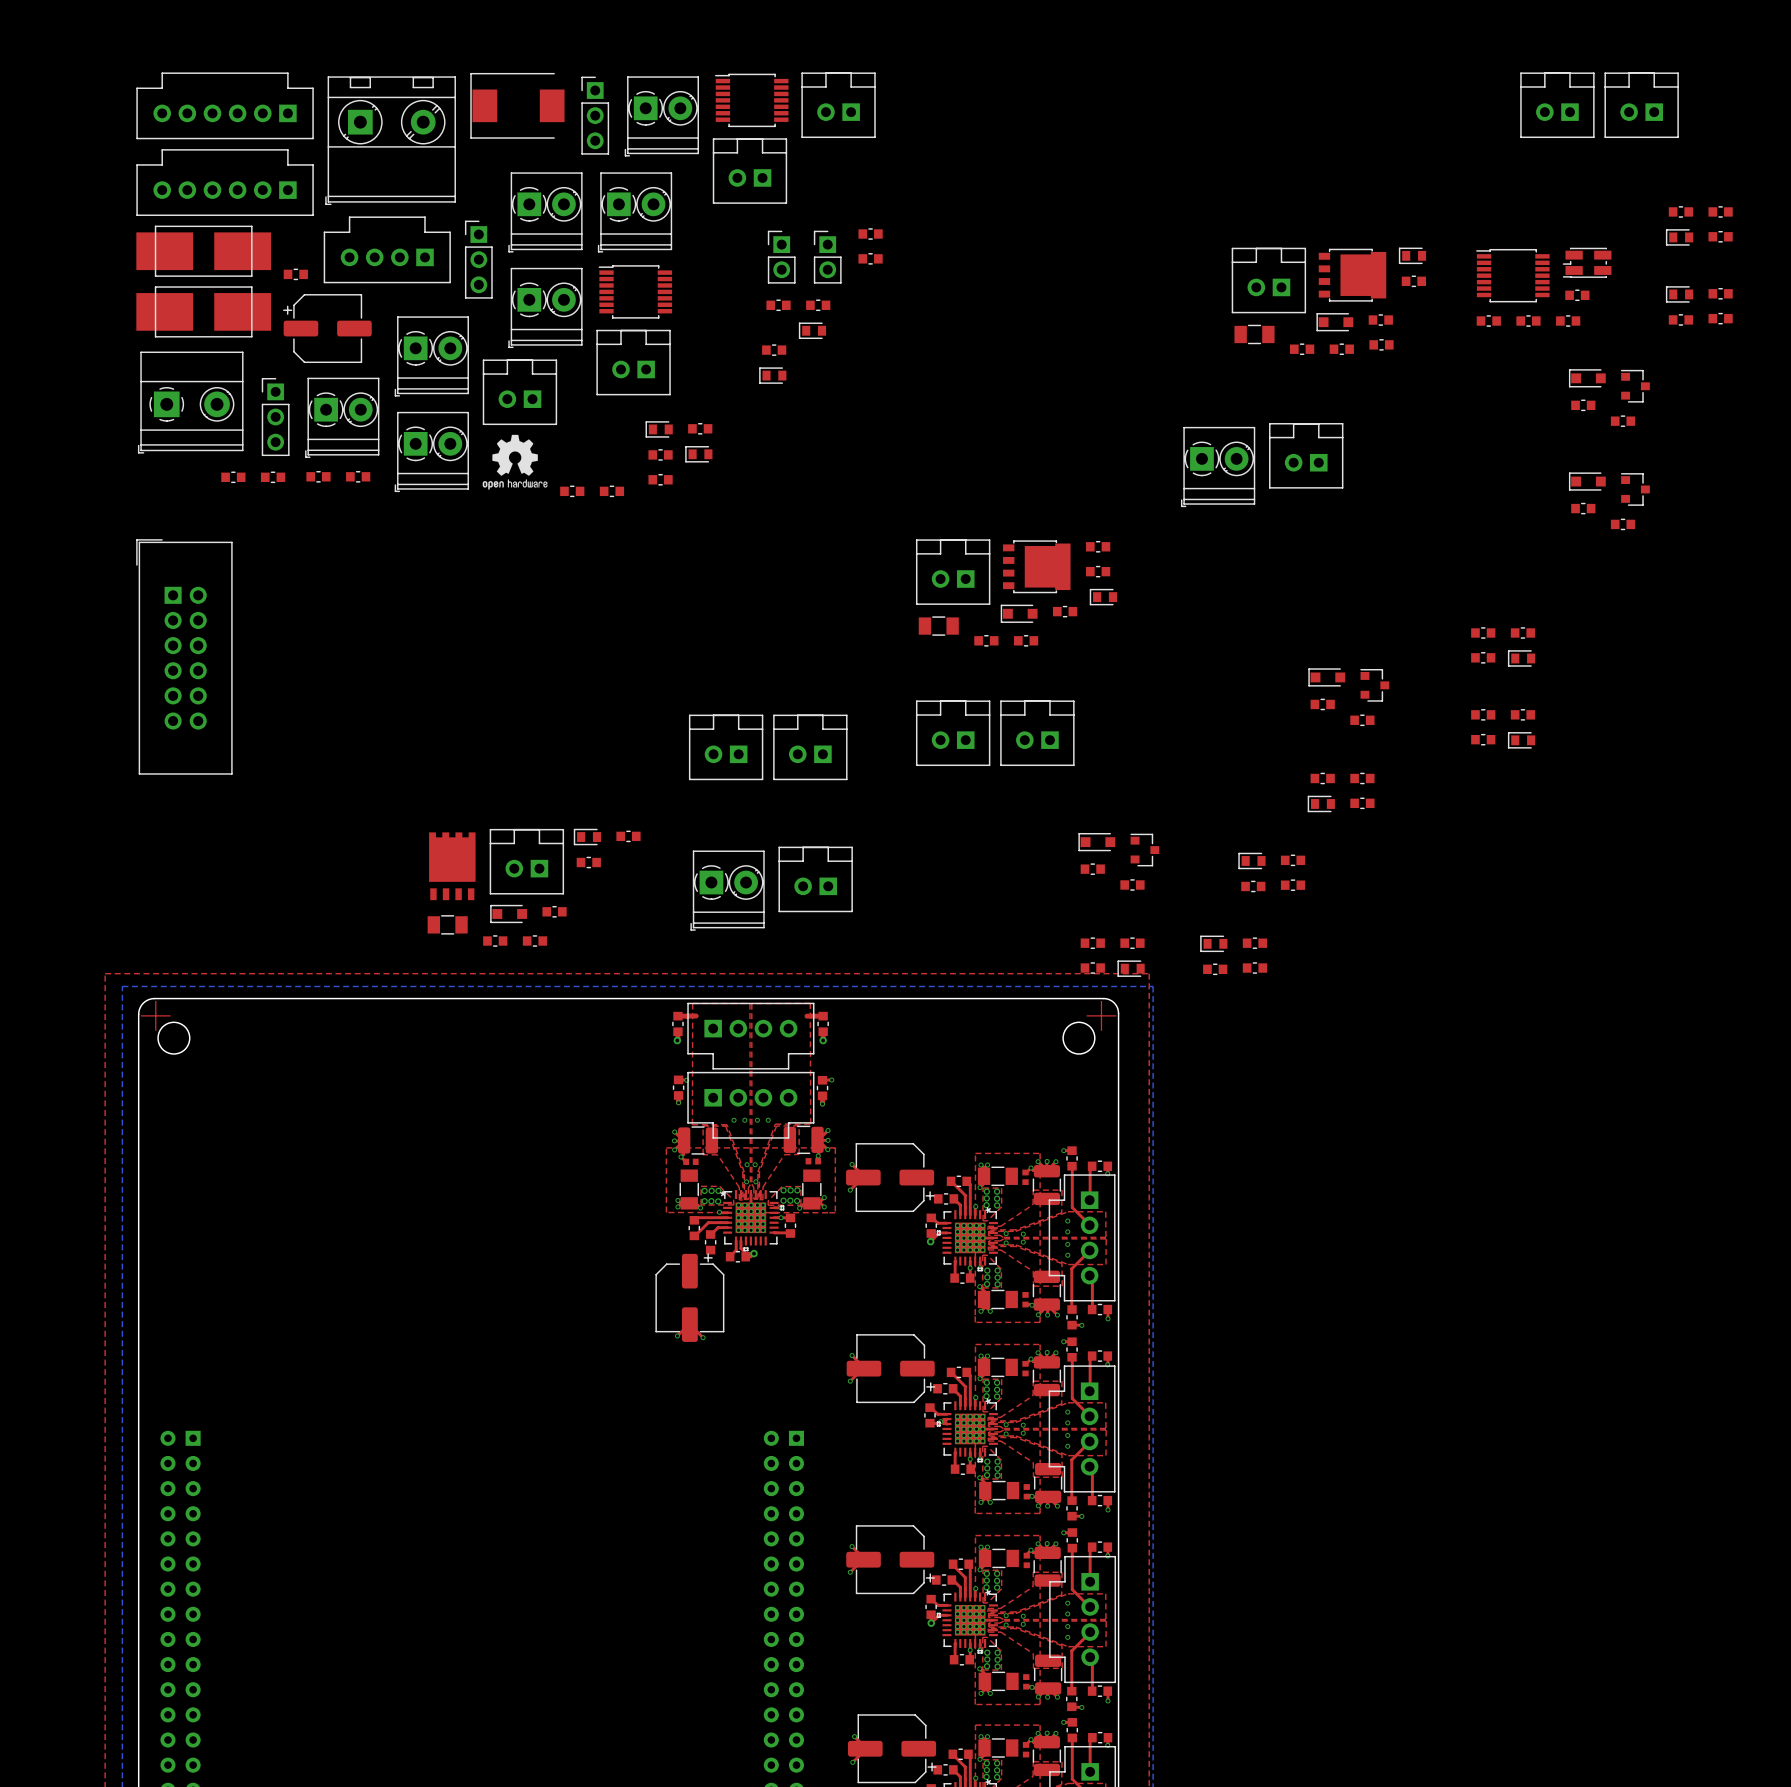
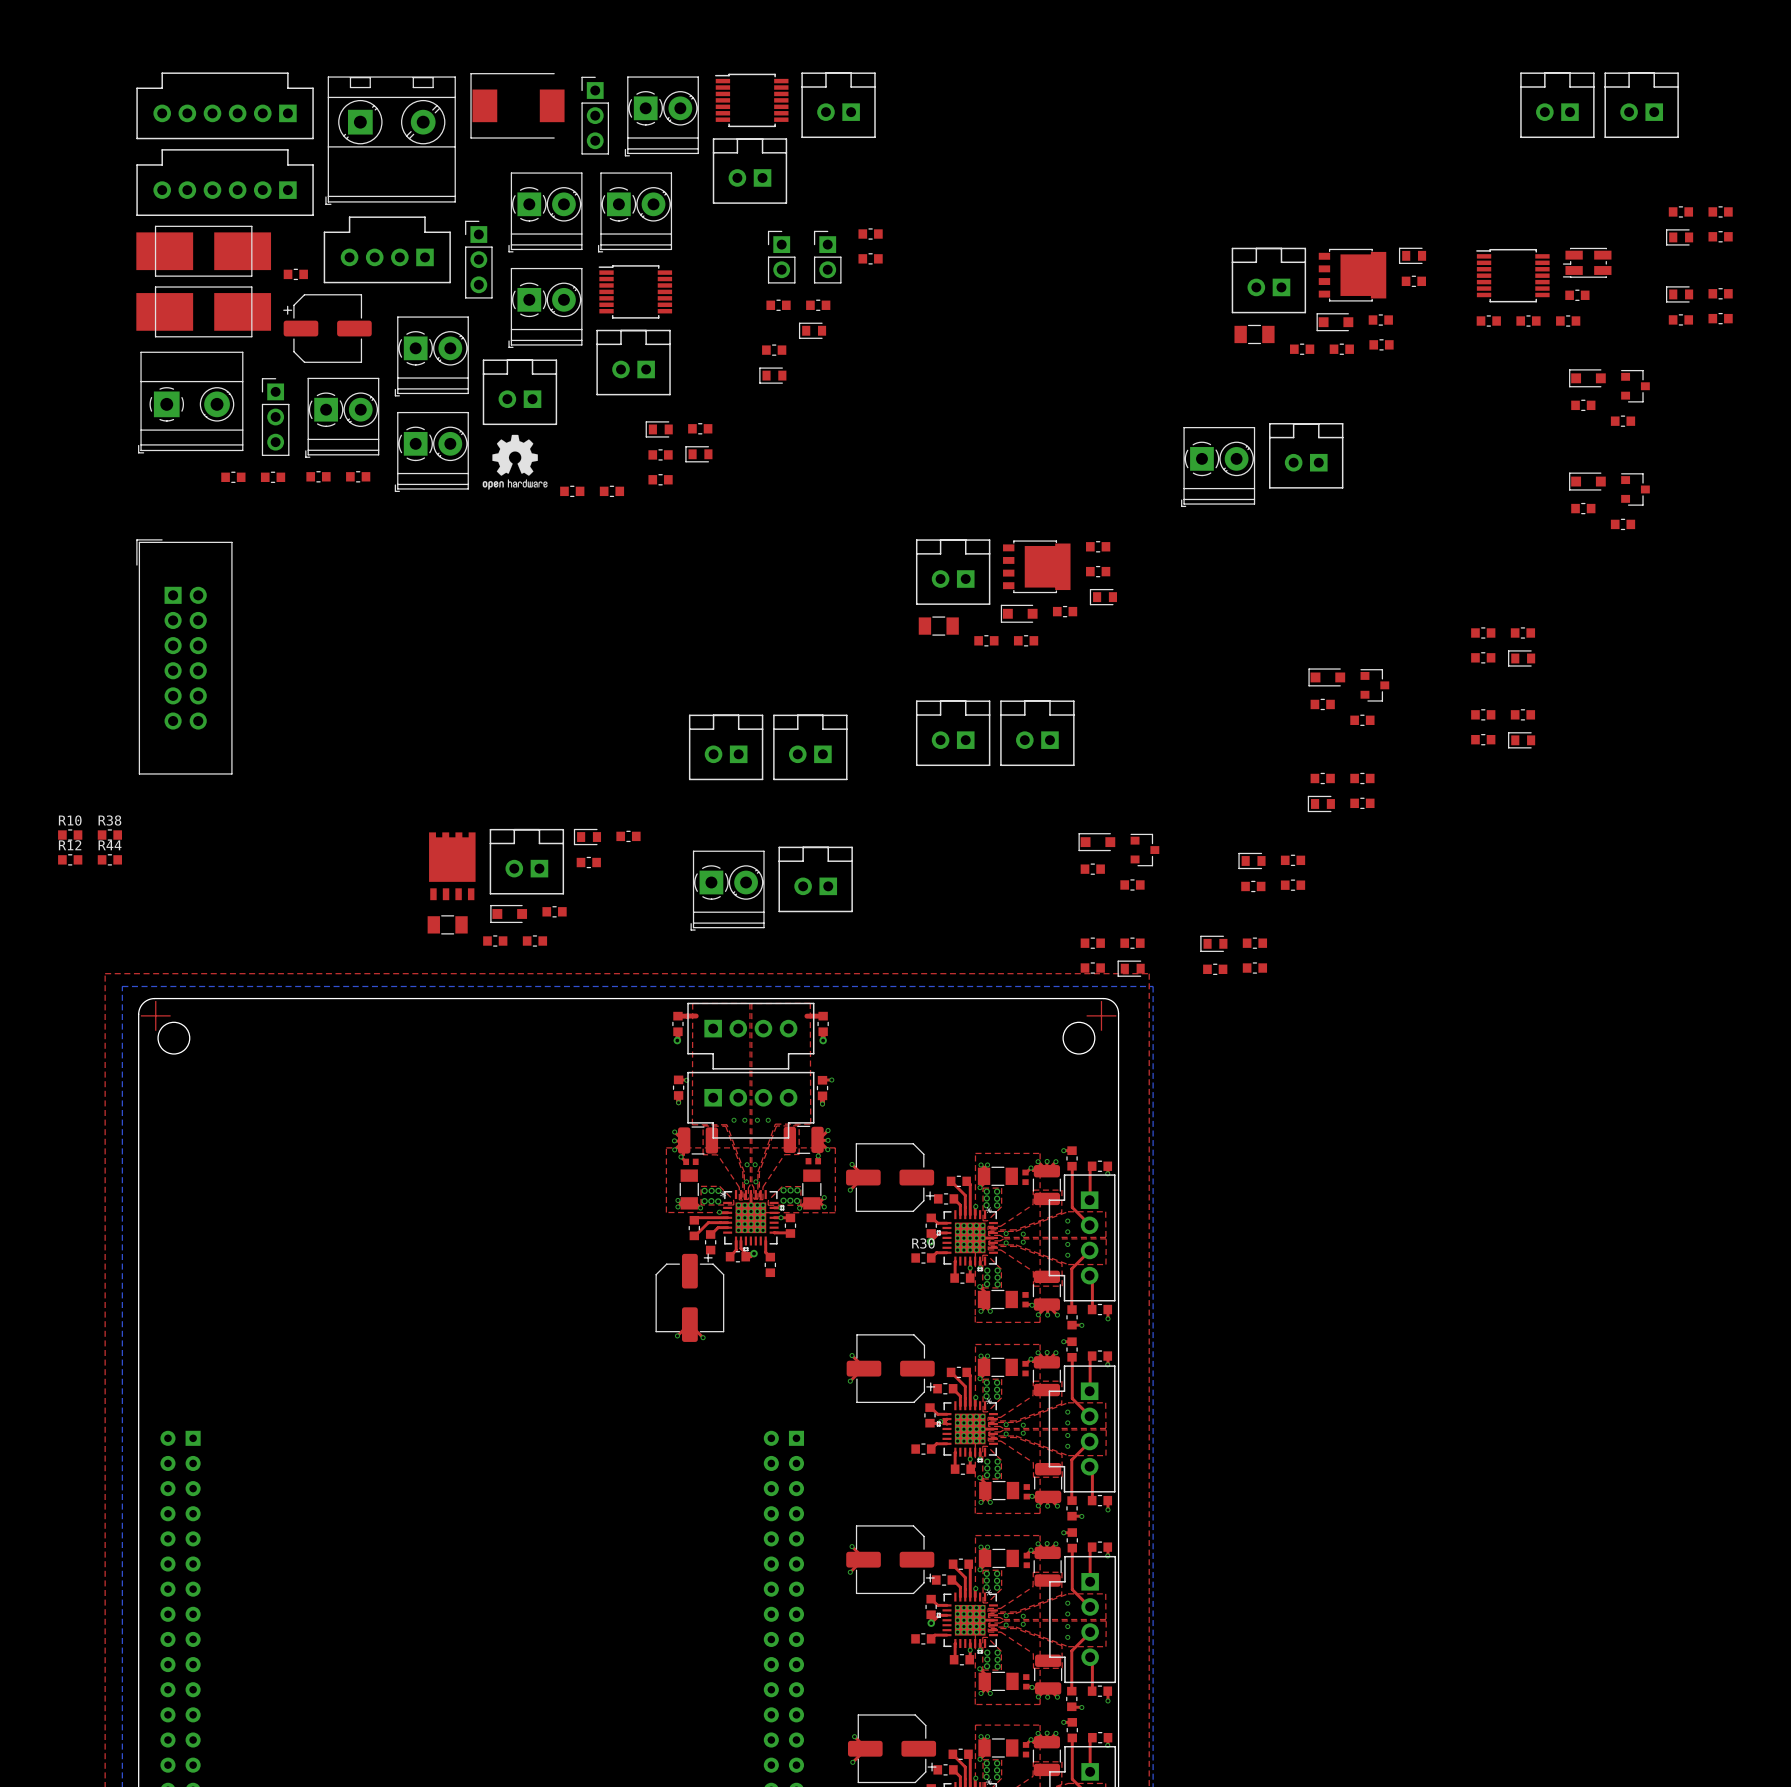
R10: none -> (70, 835)
R38: none -> (109, 835)
R12: none -> (70, 859)
R44: none -> (109, 859)
top track: none -> (765, 1241) (765, 1252) (770, 1257)
top track: none -> (946, 1252) (936, 1252) (931, 1258)
R30: none -> (923, 1258)
part: none -> (770, 1264)
top track: none -> (946, 1443) (936, 1443) (931, 1449)
part: none -> (923, 1449)
top track: none -> (946, 1635) (934, 1635) (931, 1638)
part: none -> (923, 1638)

